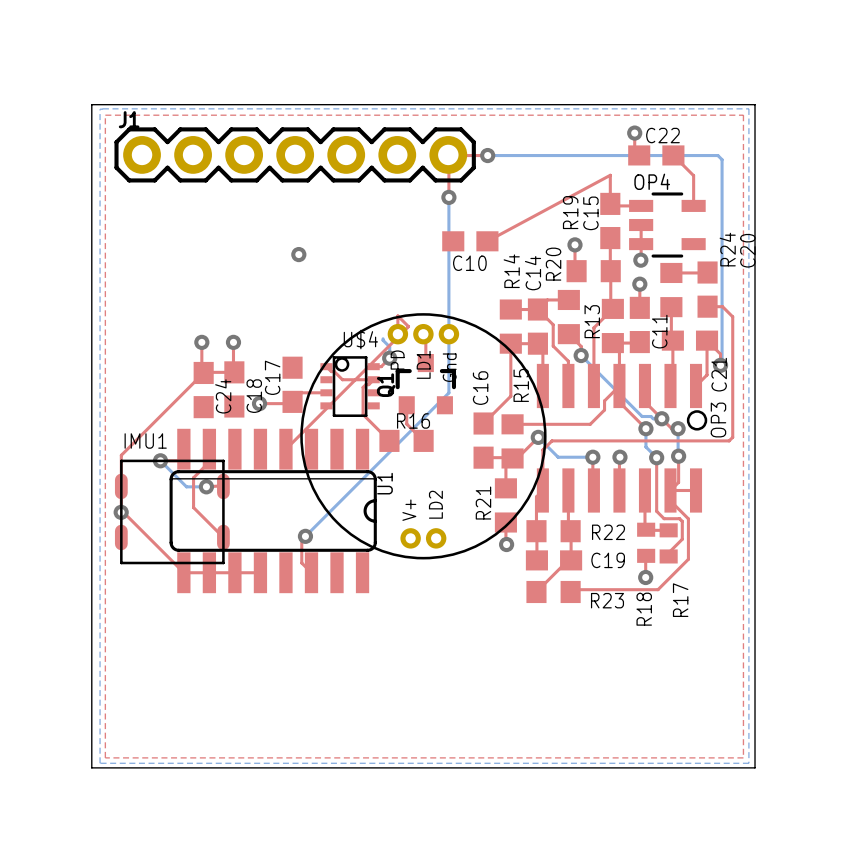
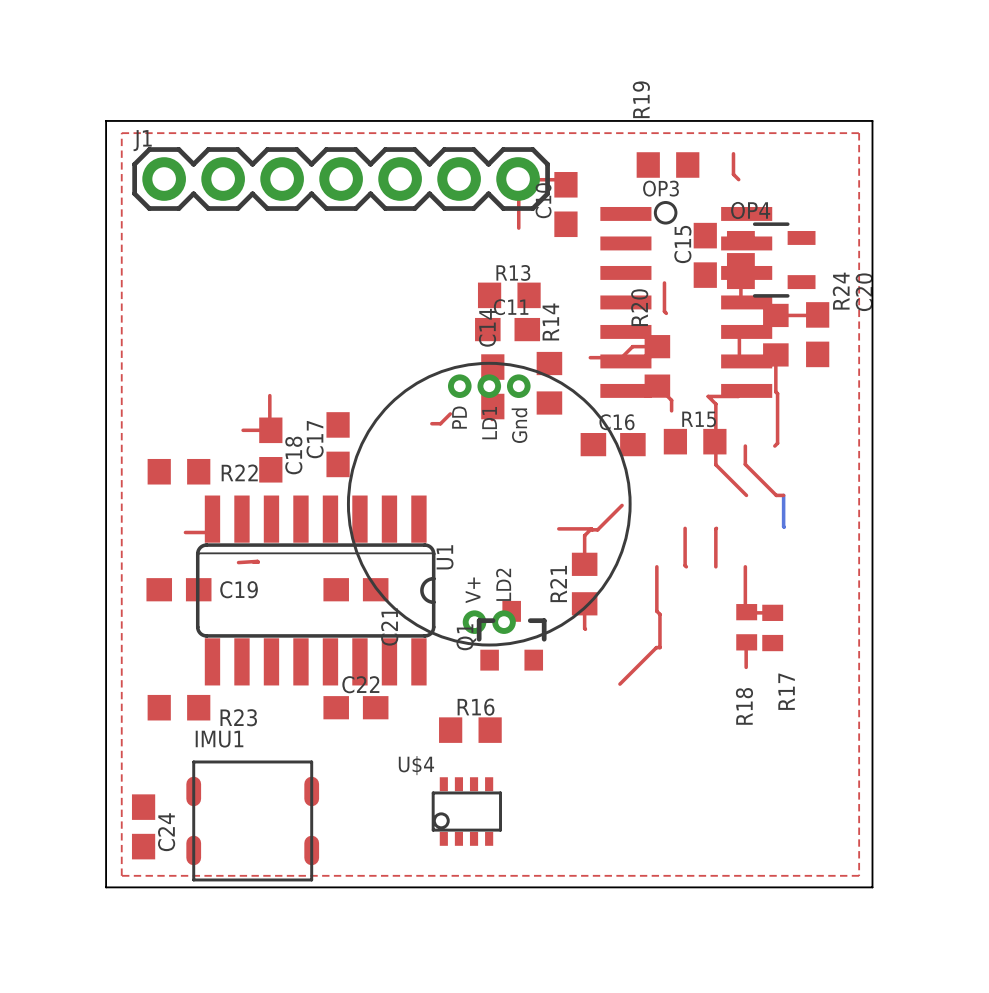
bottom zone outline: (102, 108) (748, 108) (748, 763) (100, 763) (100, 109) (102, 109) -> none
via: (634, 133) -> none
bottom track: (487, 155) (717, 155) (722, 159) (722, 363) (720, 365) -> none
via: (487, 155) -> none
C22 position: (656, 155) -> (355, 707)
top track: (673, 155) (693, 175) (693, 205) -> none
bottom track: (448, 197) (448, 392) (305, 536) -> none
via: (448, 197) -> none
top track: (641, 205) (612, 205) (610, 203) (610, 175) (487, 241) -> none
top track: (610, 238) (610, 306) (612, 308) (593, 327) (593, 385) -> none
C10 rotation: 0° (470, 241) -> 90° clockwise (565, 204)
C10 position: (470, 241) -> (565, 204)
via: (574, 244) -> none
via: (298, 254) -> none
via: (640, 260) -> none
R19 position: (593, 271) -> (668, 164)
via: (639, 284) -> none
top track: (707, 306) (722, 306) (732, 316) (732, 437) (729, 440) (552, 440) (542, 450) (542, 490) (536, 496) (536, 560) -> none
top track: (537, 309) (553, 324) (553, 346) (568, 361) (568, 385) -> none
C11 rotation: 0° (639, 324) -> 90° clockwise (507, 329)
C11 position: (639, 324) -> (507, 329)
R13 rotation: 0° (612, 325) -> 90° clockwise (509, 295)
R13 position: (612, 325) -> (509, 295)
R14 position: (510, 326) -> (549, 383)
C14 position: (537, 326) -> (492, 386)
top track: (397, 334) (397, 315) (408, 326) (285, 449) -> none
bottom track: (383, 338) (389, 346) (389, 358) -> none
C21 position: (689, 340) -> (355, 589)
top track: (201, 342) (201, 371) (203, 372) (121, 455) (121, 512) (183, 572) (260, 572) -> none
via: (201, 342) -> none
via: (233, 342) -> none
bottom track: (581, 355) (642, 416) (661, 418) -> none
via: (581, 355) -> none
via: (389, 358) -> none
top track: (720, 365) (720, 354) (707, 340) (707, 374) (696, 385) -> none
via: (720, 365) -> none
top track: (326, 366) (342, 379) (373, 379) (363, 387) (363, 414) (389, 440) -> none
Q1 position: (425, 384) -> (511, 635)
top track: (542, 385) (542, 348) (537, 343) (510, 343) (510, 396) (483, 423) -> none
top track: (619, 385) (604, 400) (604, 409) (590, 424) (512, 424) -> none
U$4 rotation: 0° (350, 386) -> 90° counterclockwise (466, 811)
U$4 position: (350, 386) -> (466, 811)
C24 position: (203, 390) -> (143, 826)
top track: (326, 392) (301, 392) (290, 403) (259, 403) -> none
via: (259, 403) -> none
top track: (406, 405) (406, 424) (423, 440) -> none
via: (661, 418) -> none
bottom track: (645, 428) (645, 447) (656, 457) -> none
via: (645, 428) -> none
via: (678, 428) -> none
bottom track: (538, 437) (558, 457) (592, 457) -> none
via: (538, 437) -> none
OP3 rotation: 0° (622, 438) -> 90° counterclockwise (686, 299)
OP3 position: (622, 438) -> (686, 299)
R16 position: (406, 440) -> (470, 730)
C16 rotation: 0° (483, 440) -> 90° clockwise (613, 444)
C16 position: (483, 440) -> (613, 444)
R15 rotation: 0° (512, 441) -> 90° clockwise (695, 441)
R15 position: (512, 441) -> (695, 441)
top track: (209, 449) (209, 461) (193, 477) (193, 507) (223, 537) -> none
top track: (678, 456) (678, 482) (670, 490) (696, 490) -> none
via: (678, 456) -> none
via: (592, 457) -> none
via: (619, 457) -> none
top track: (656, 457) (656, 511) (664, 518) (679, 518) (682, 521) (682, 539) (668, 552) (668, 556) -> none
via: (656, 457) -> none
bottom track: (160, 460) (186, 486) (206, 486) -> none
via: (160, 460) -> none
via: (206, 486) -> none
top track: (672, 488) (672, 502) (688, 518) (688, 559) (658, 589) (572, 589) (570, 591) -> none
IMU1 position: (172, 511) -> (252, 820)
via: (121, 512) -> none
R22 position: (553, 531) -> (178, 471)
top track: (305, 536) (301, 540) (301, 563) (311, 572) -> none
via: (305, 536) -> none
via: (506, 544) -> none
C19 position: (554, 560) -> (178, 589)
via: (645, 577) -> none
R23 position: (553, 591) -> (178, 707)

